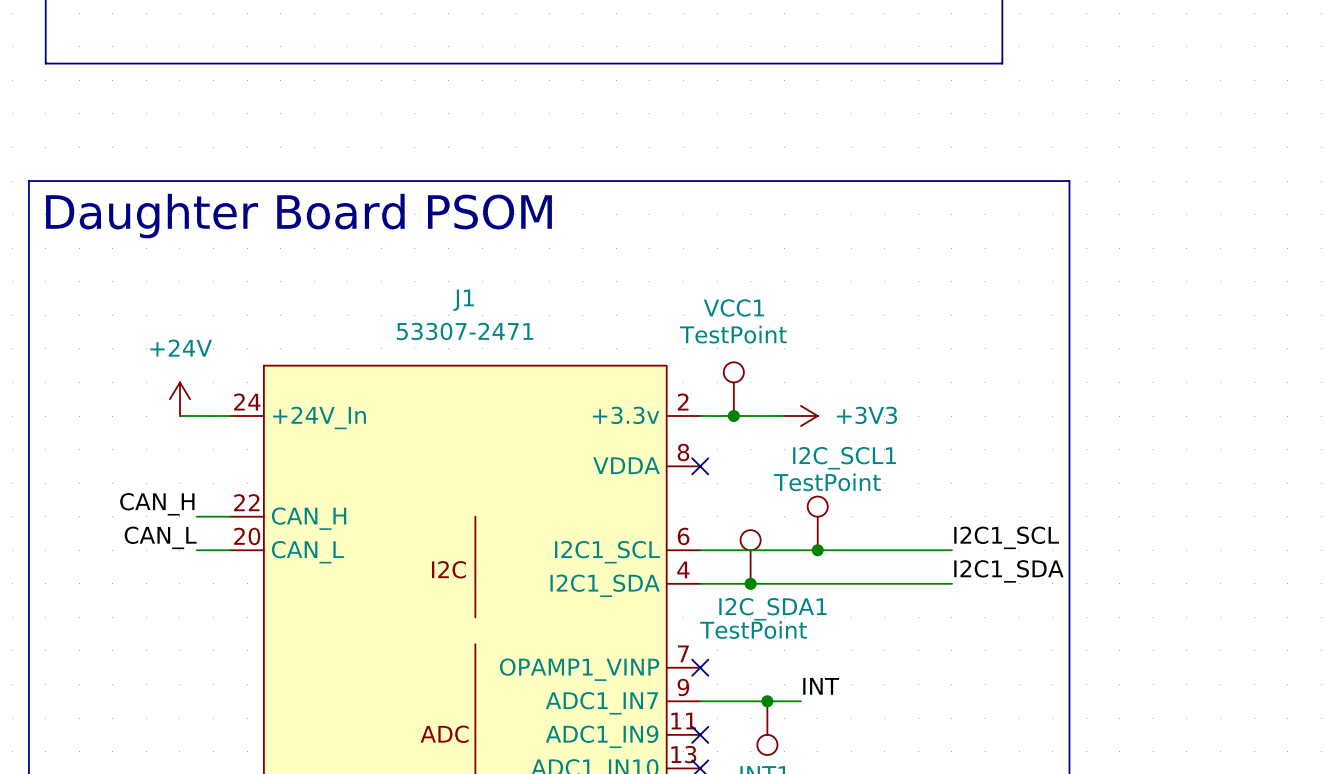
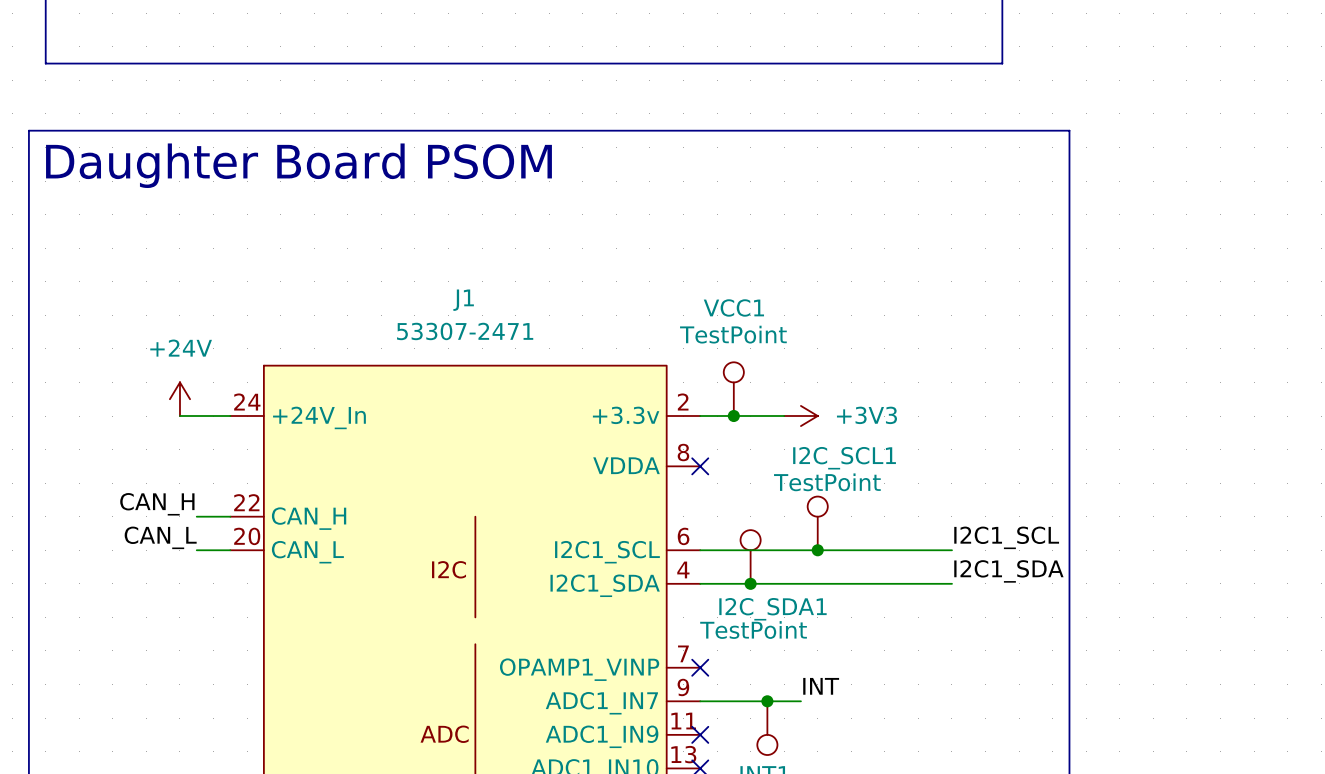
line: (28, 181) (1069, 181) -> (28, 181) (28, 130) (1069, 130) (1069, 181)
text position: Daughter Board PSOM (298, 216) -> Daughter Board PSOM (298, 165)

